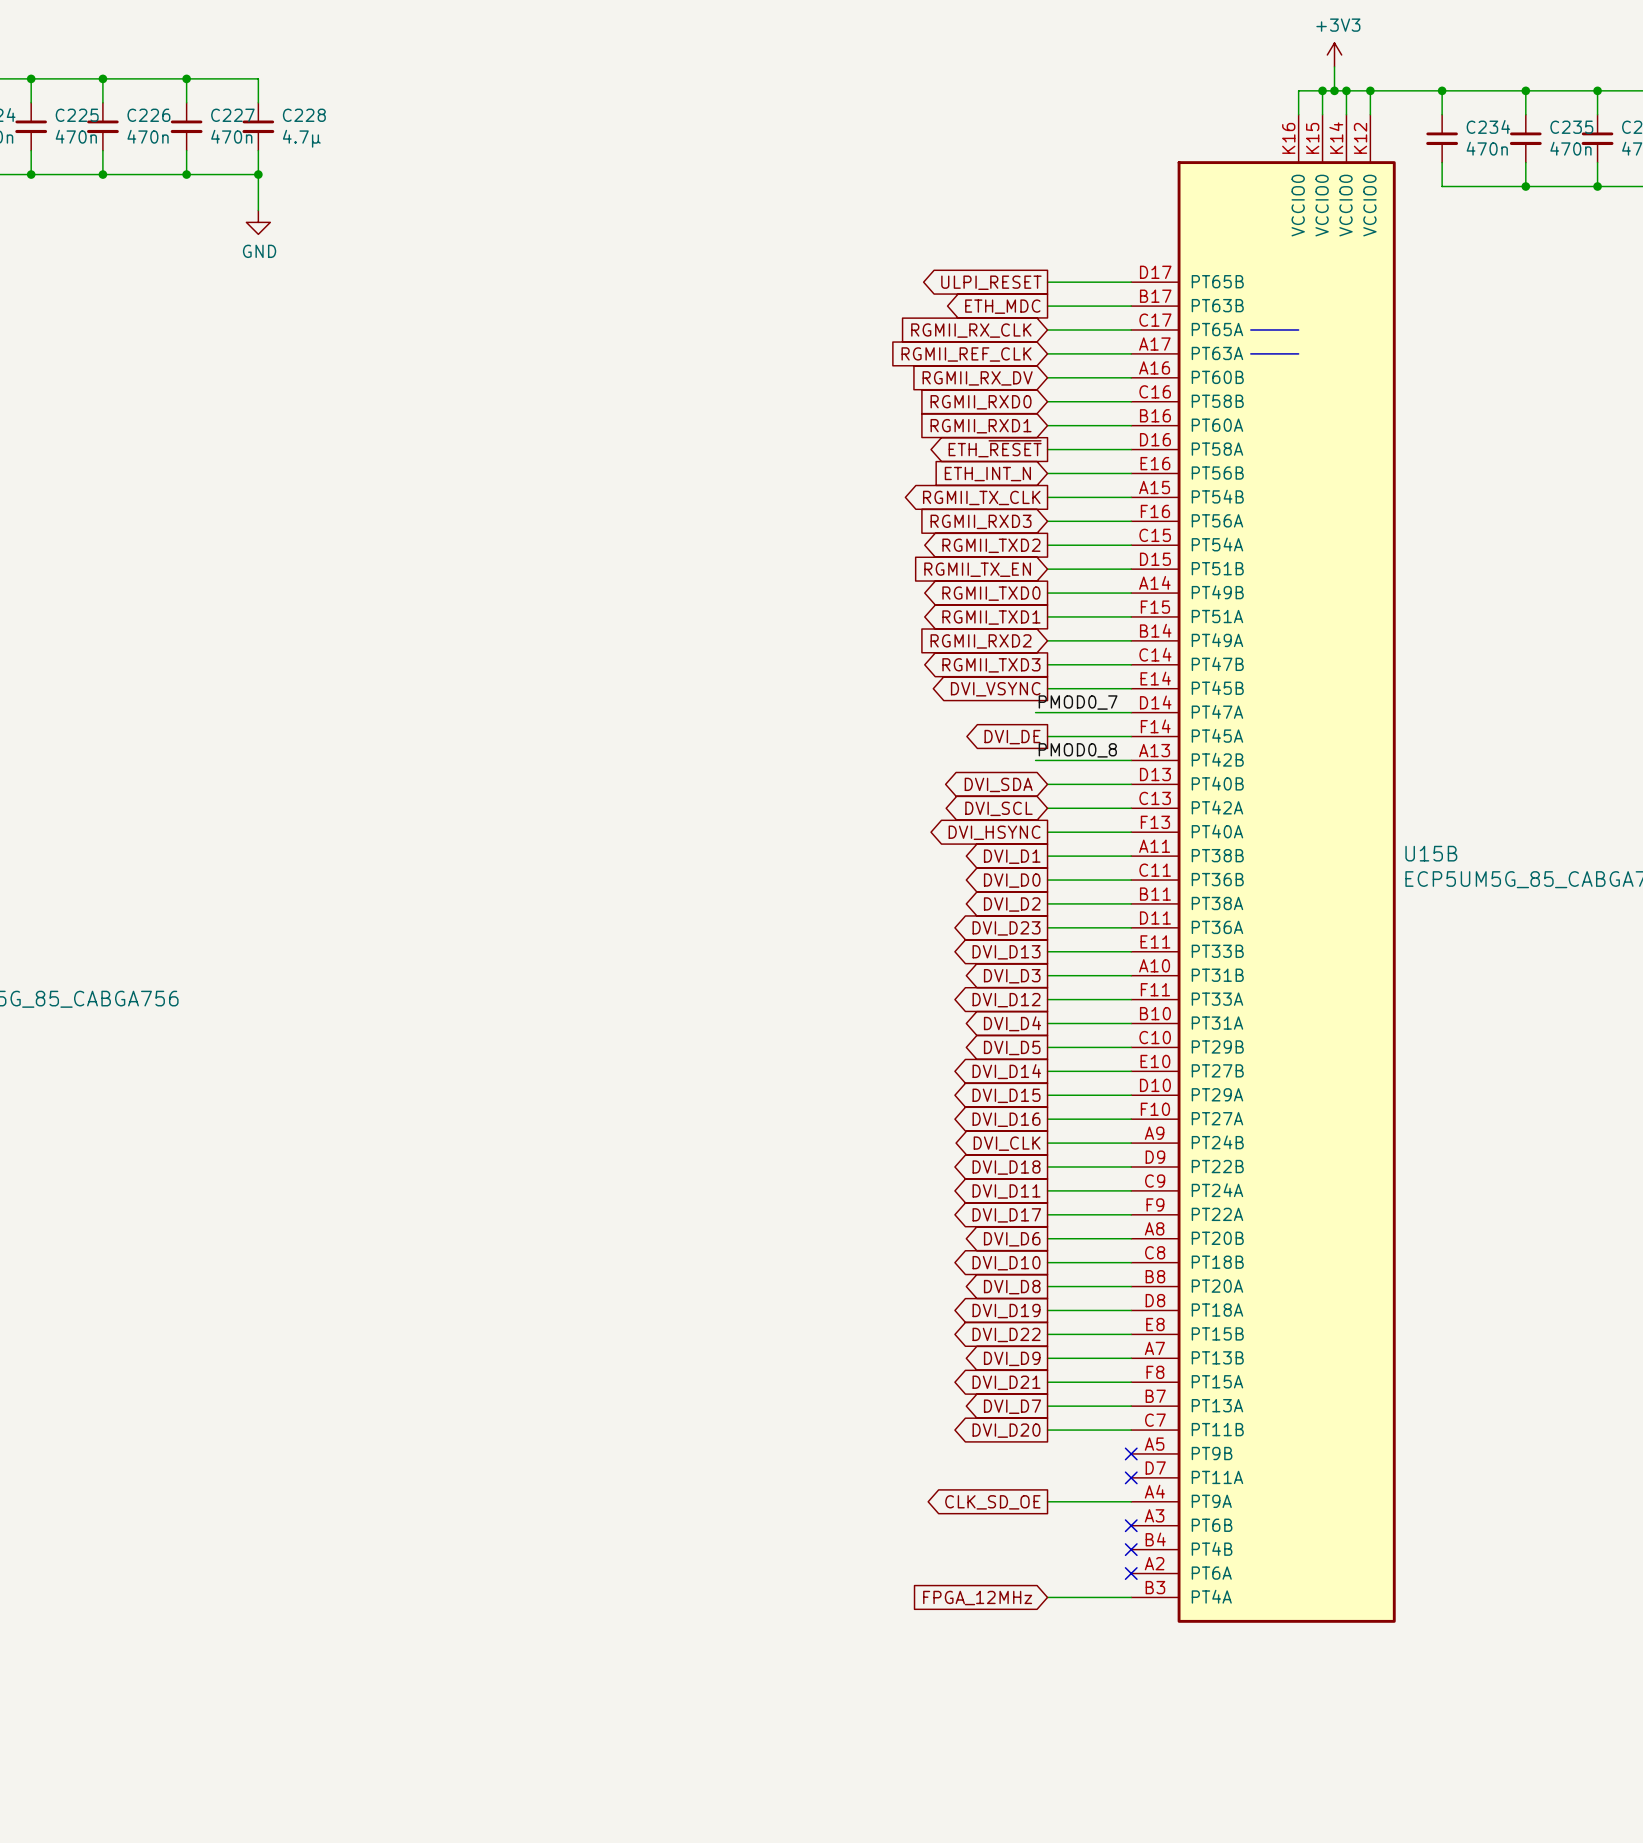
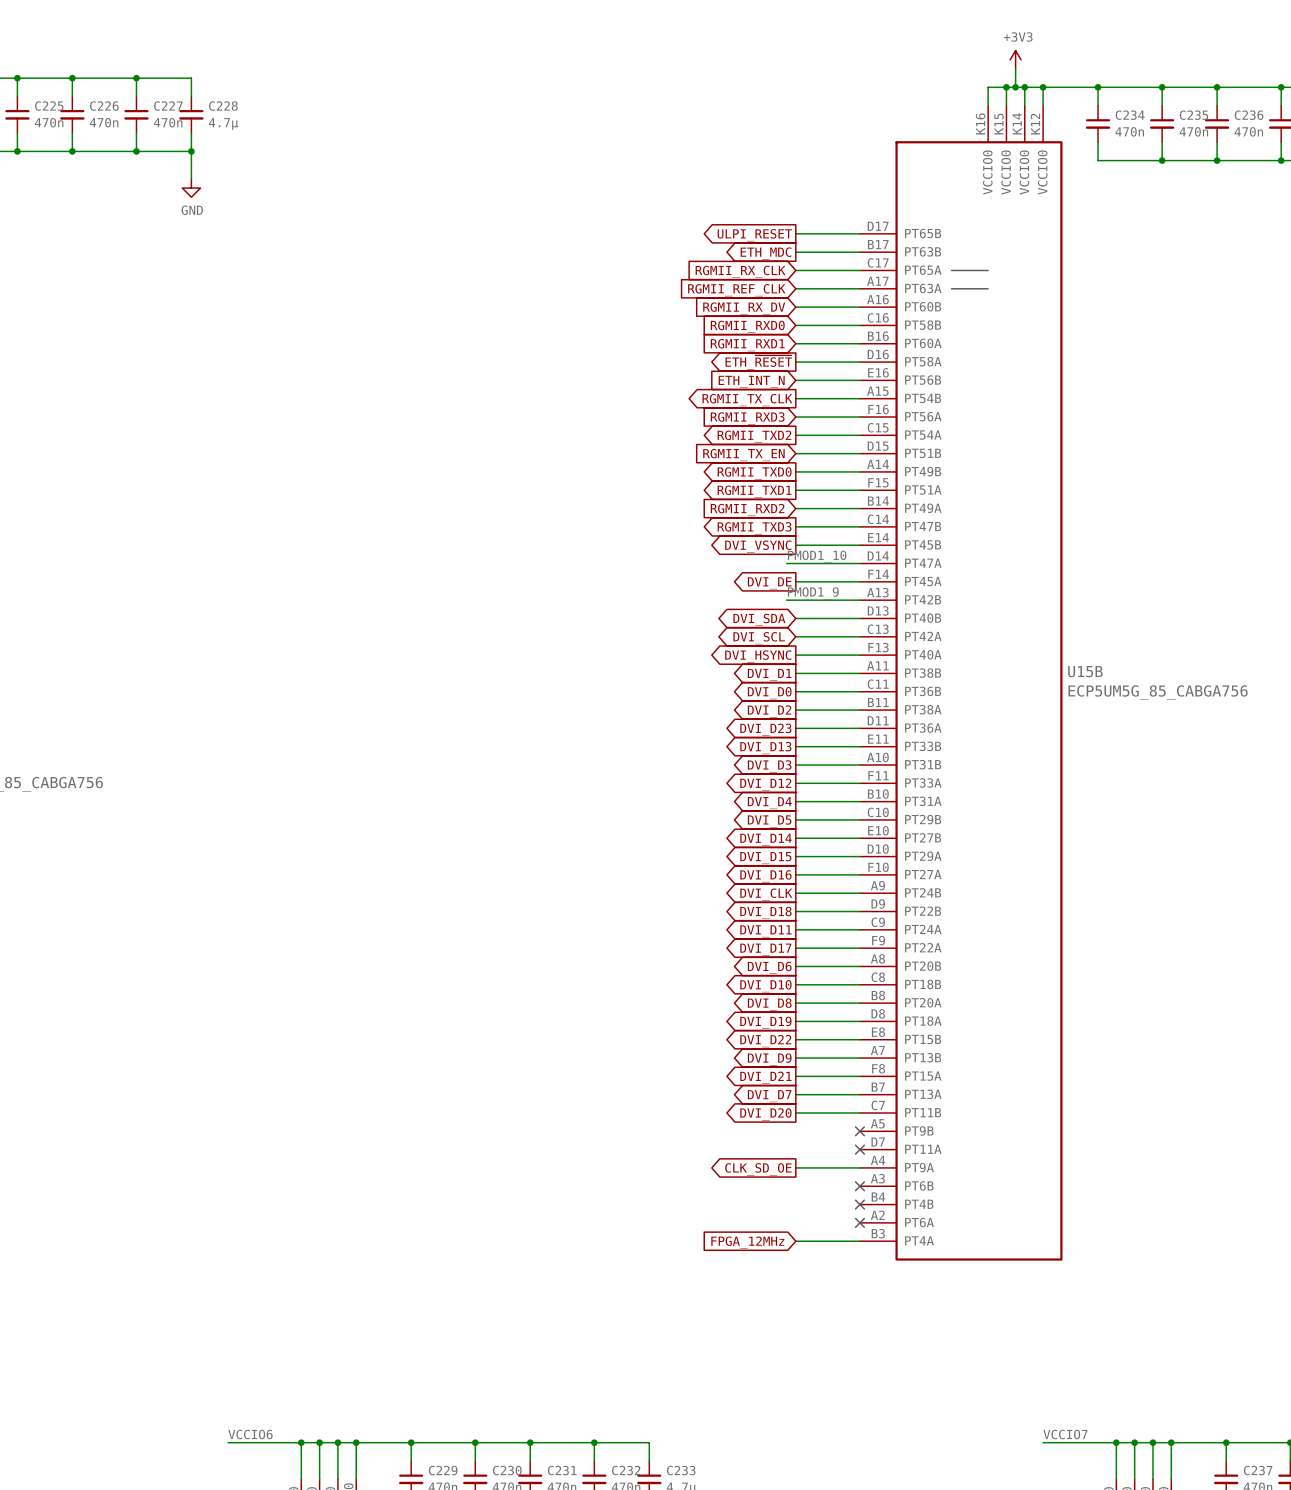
label: PMOD0_7 (1078, 702) -> PMOD1_10 (817, 556)
label: PMOD0_8 (1077, 750) -> PMOD1_9 (813, 593)

